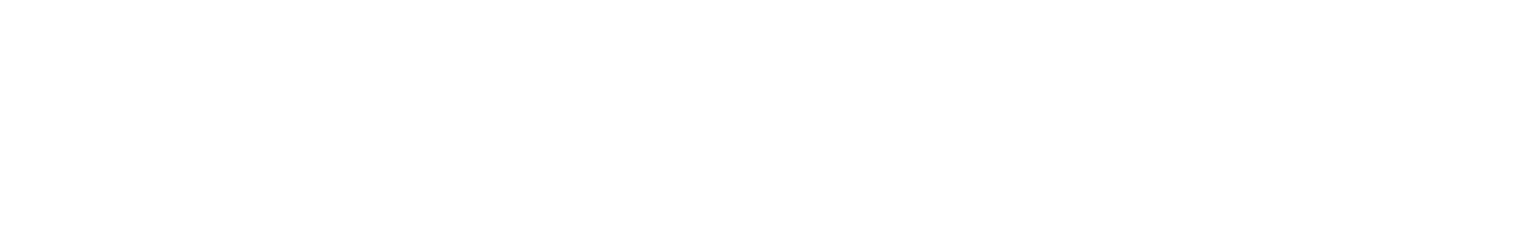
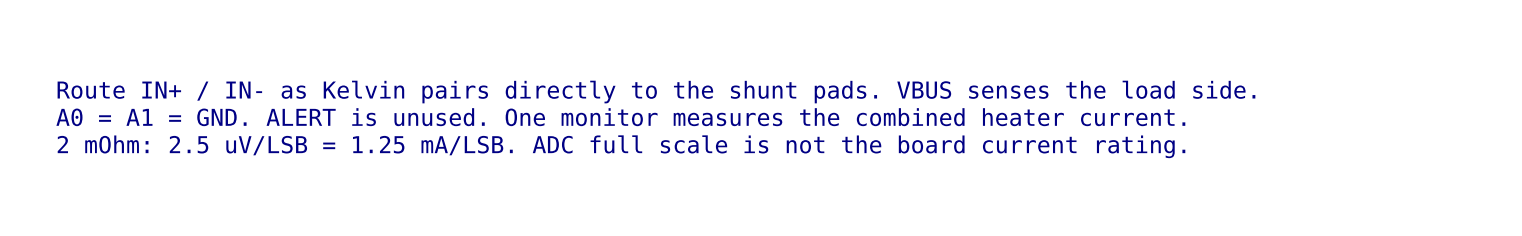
text: none -> Route IN+ / IN- as Kelvin pairs directly to the shunt pads. VBUS senses the load side. (656, 92)
text: none -> A0 = A1 = GND. ALERT is unused. One monitor measures the combined heater current. (620, 117)
text: none -> 2 mOhm: 2.5 uV/LSB = 1.25 mA/LSB. ADC full scale is not the board current rating. (621, 146)

